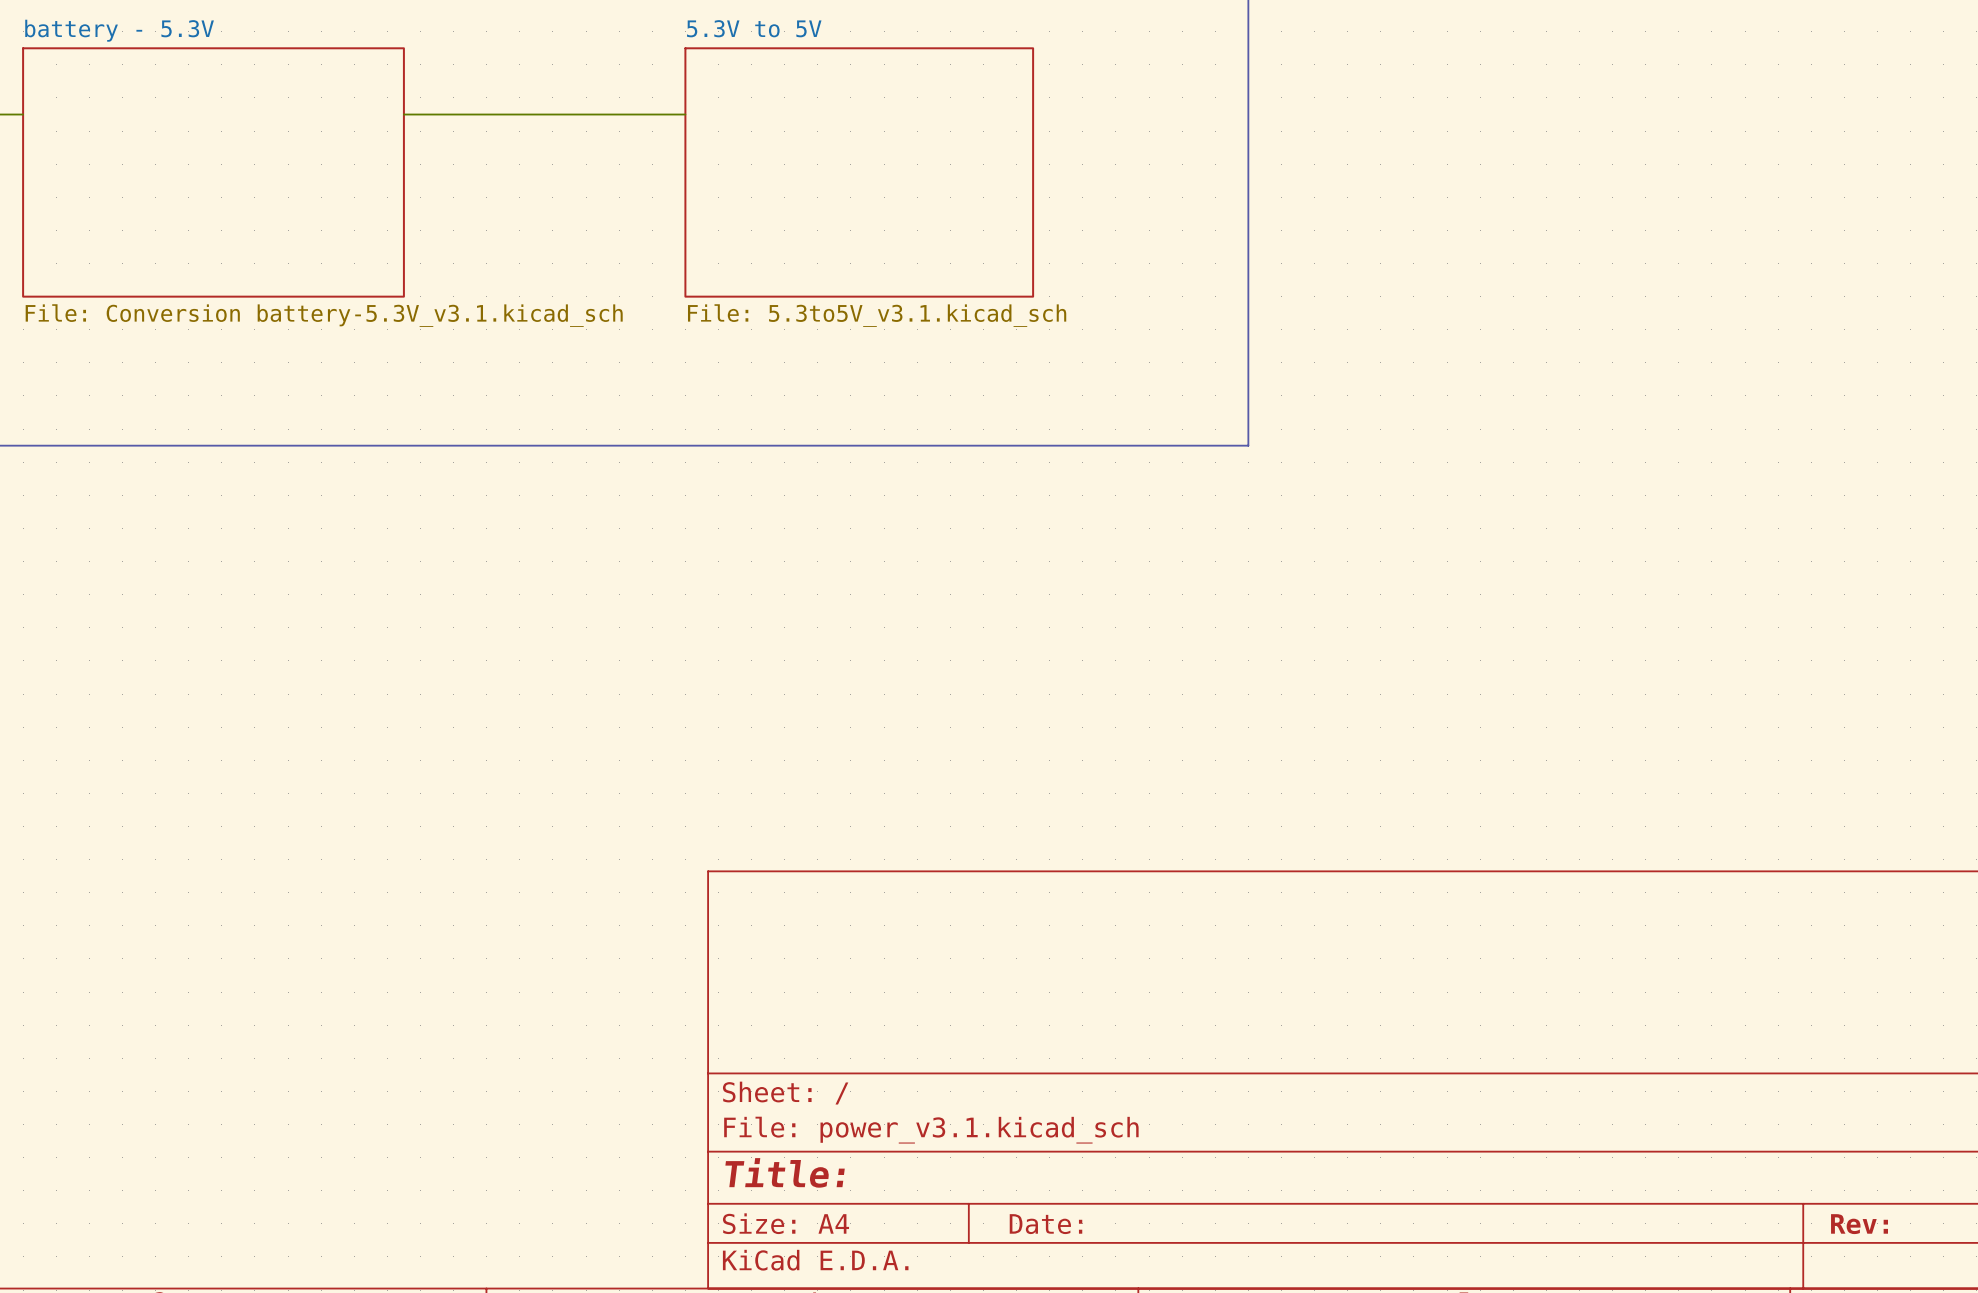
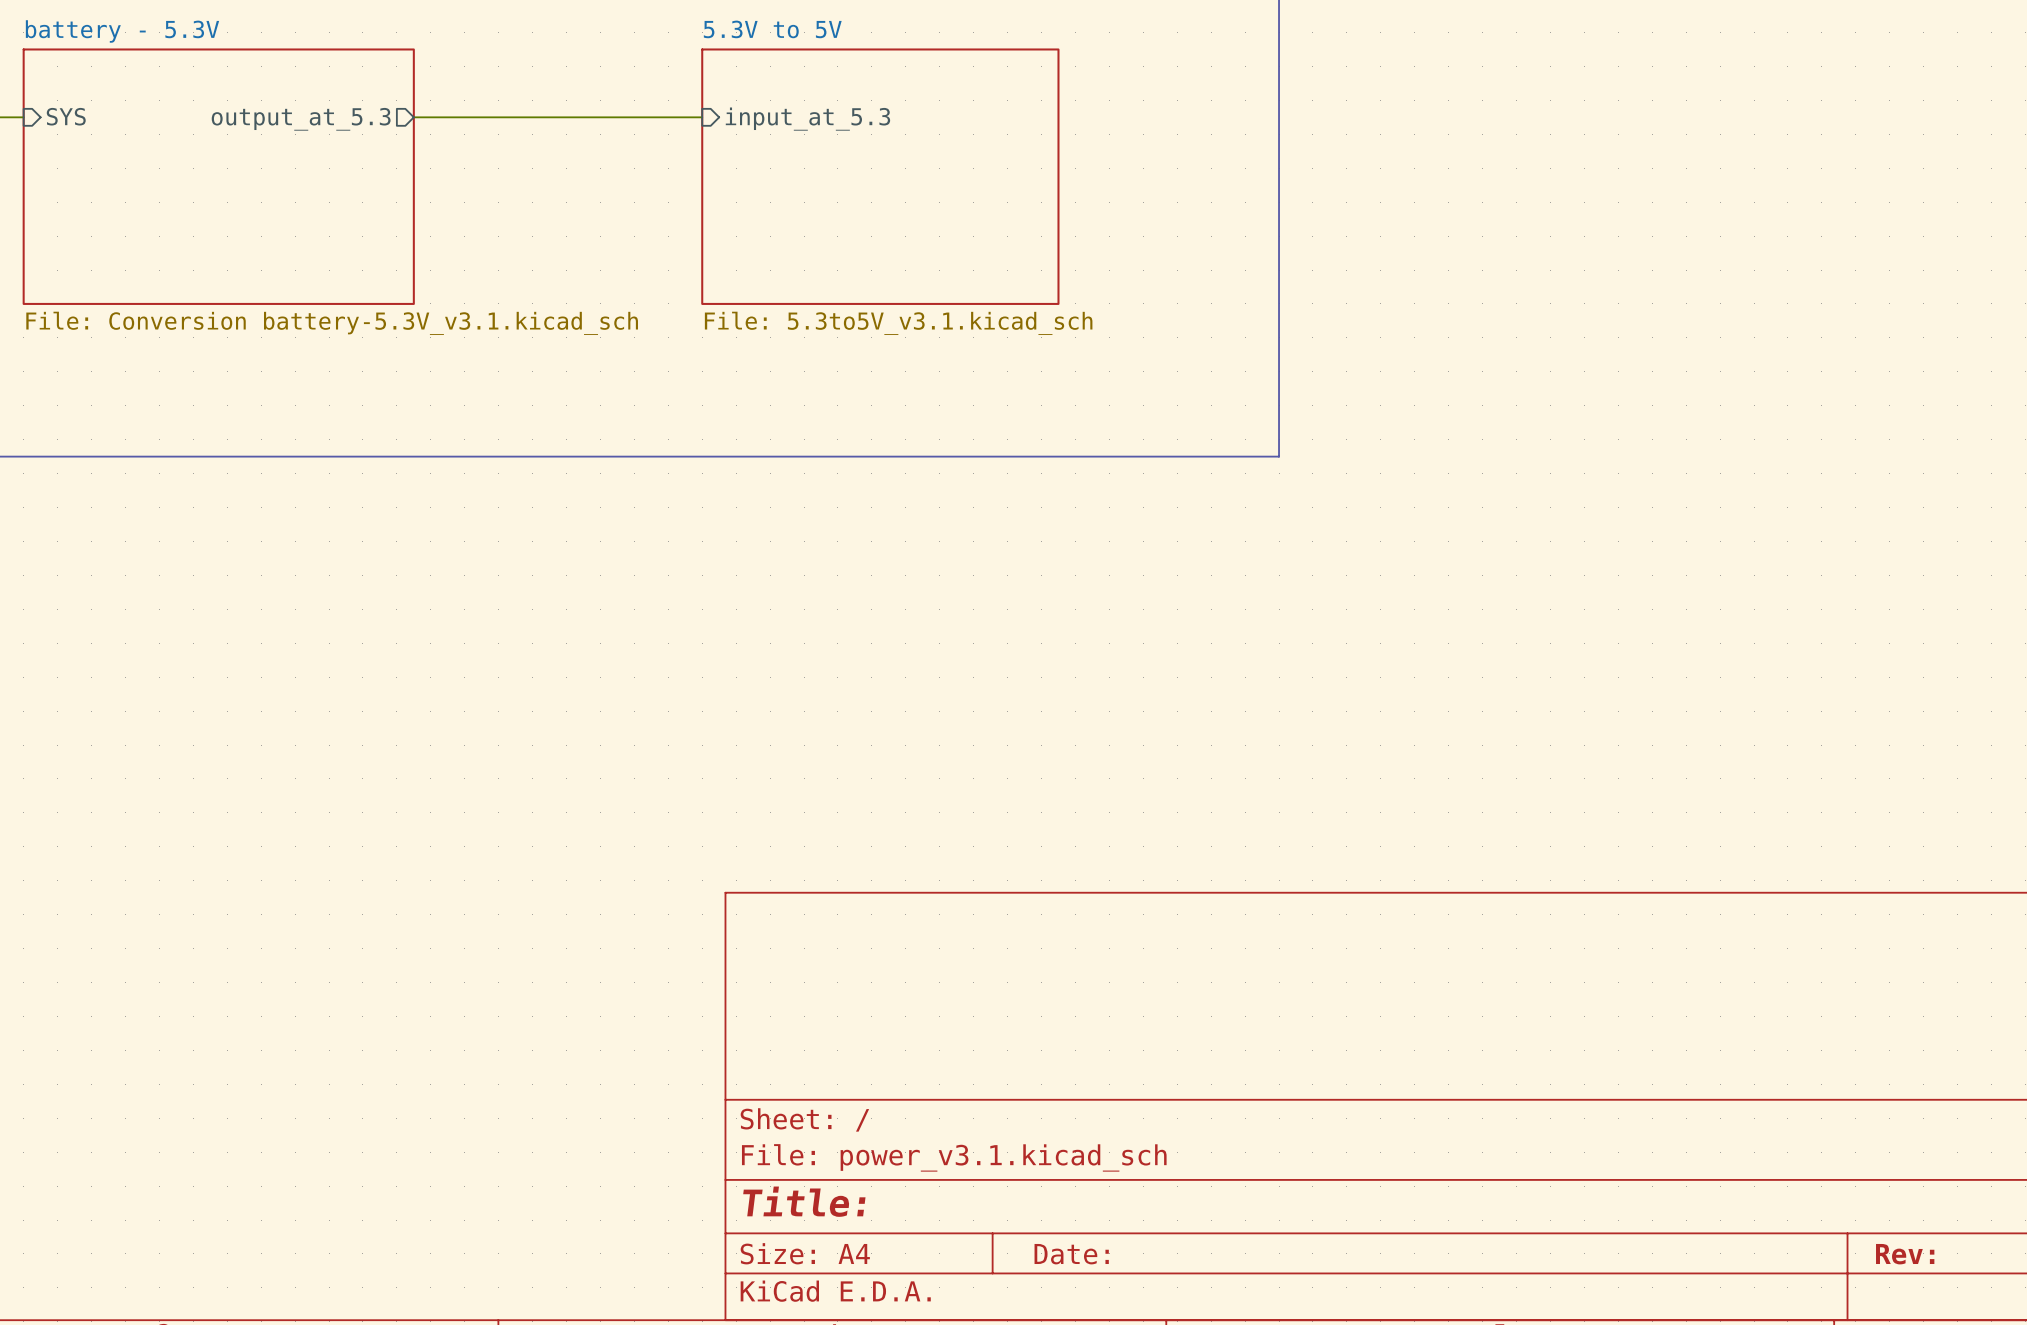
sheet pin: none -> SYS (66, 116)
sheet pin: none -> output_at_5.3 (301, 119)
sheet pin: none -> input_at_5.3 (807, 119)

